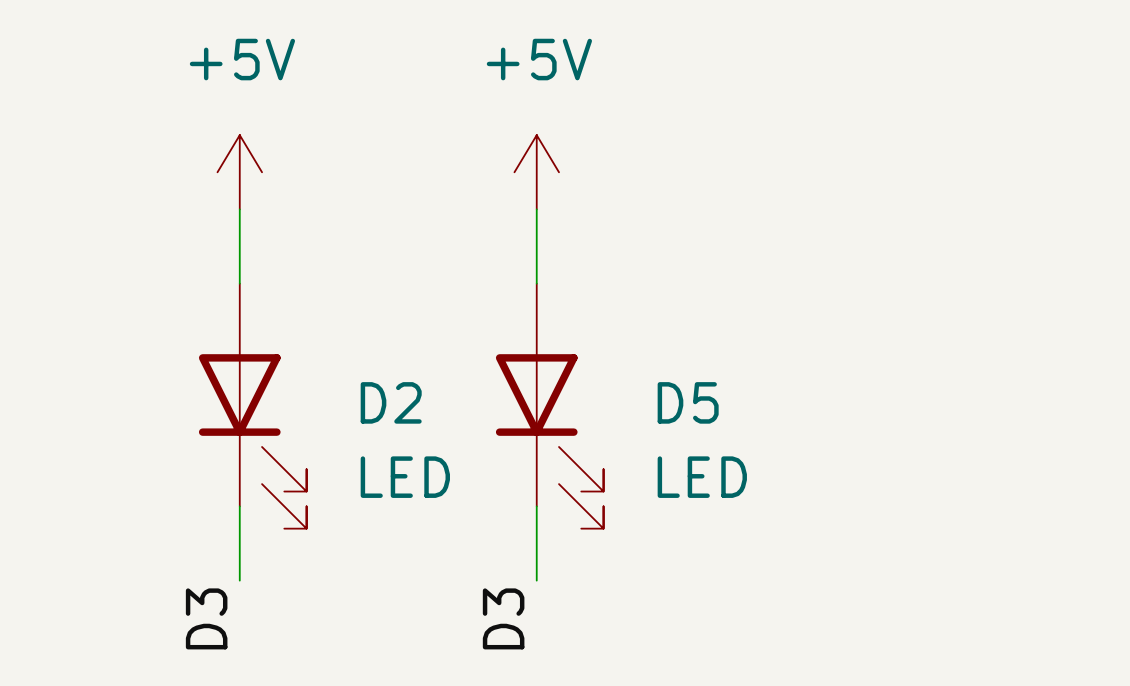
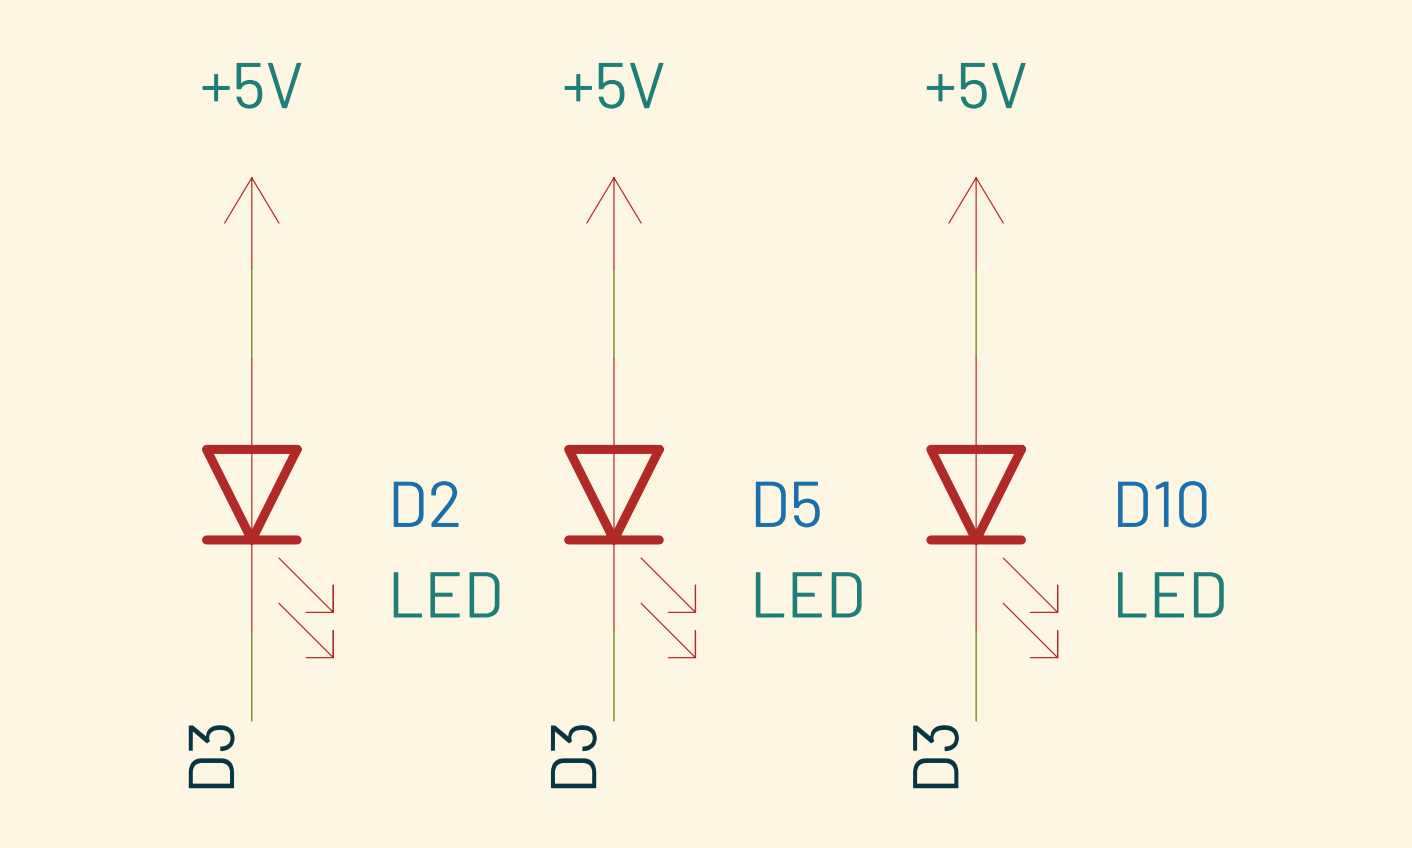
power symbol: none -> +5V (976, 223)
wire: none -> (976, 268) (976, 358)
D10: none -> LED (991, 508)
wire: none -> (976, 630) (976, 721)
label: none -> D3 (935, 756)

